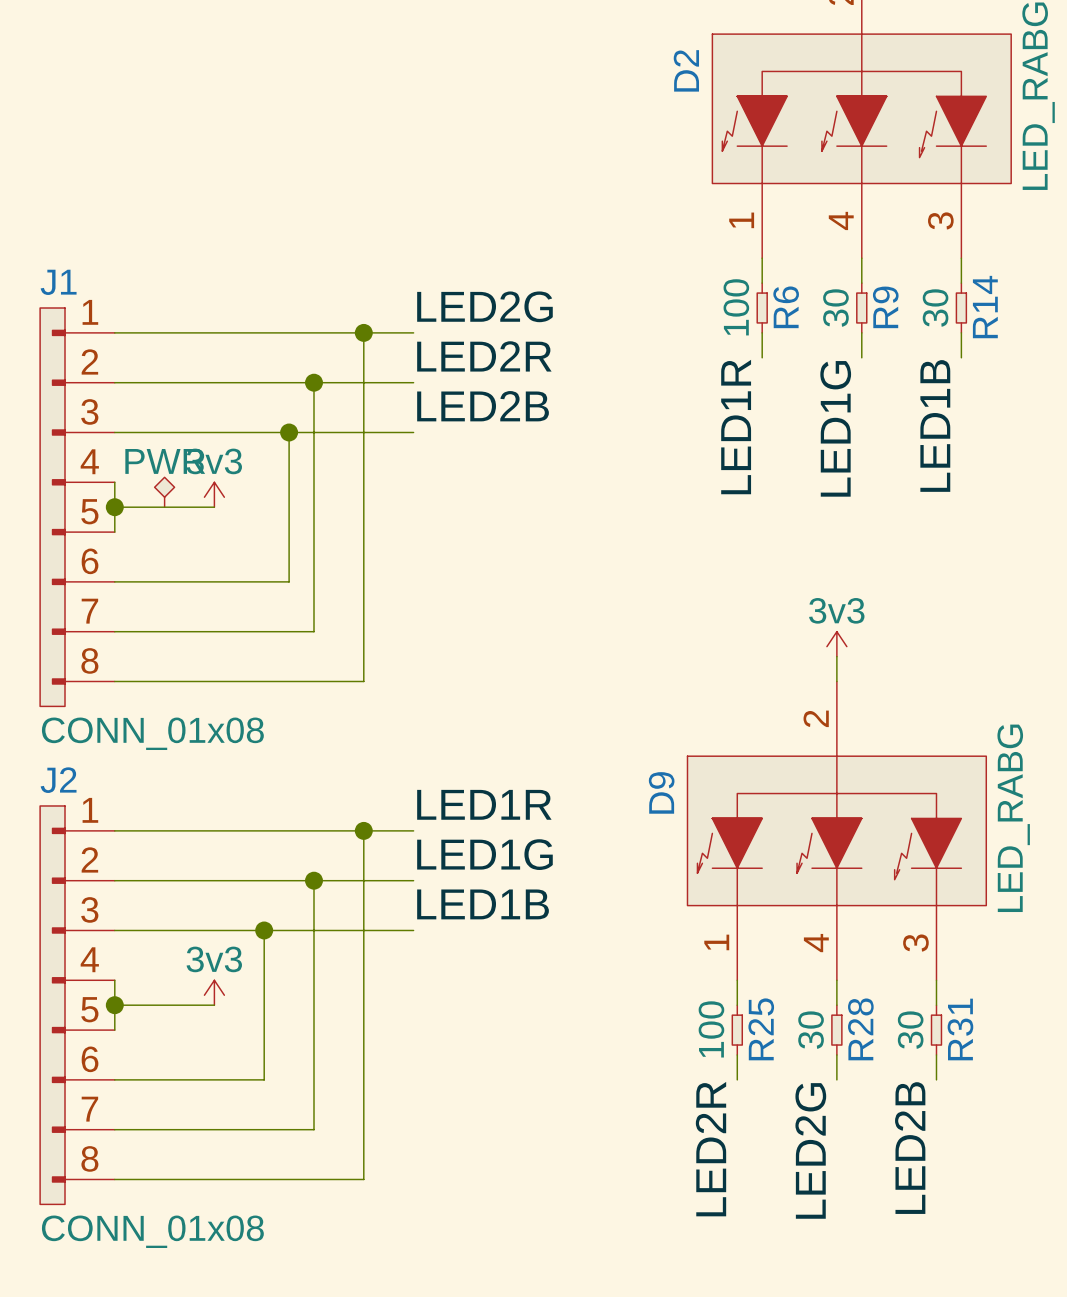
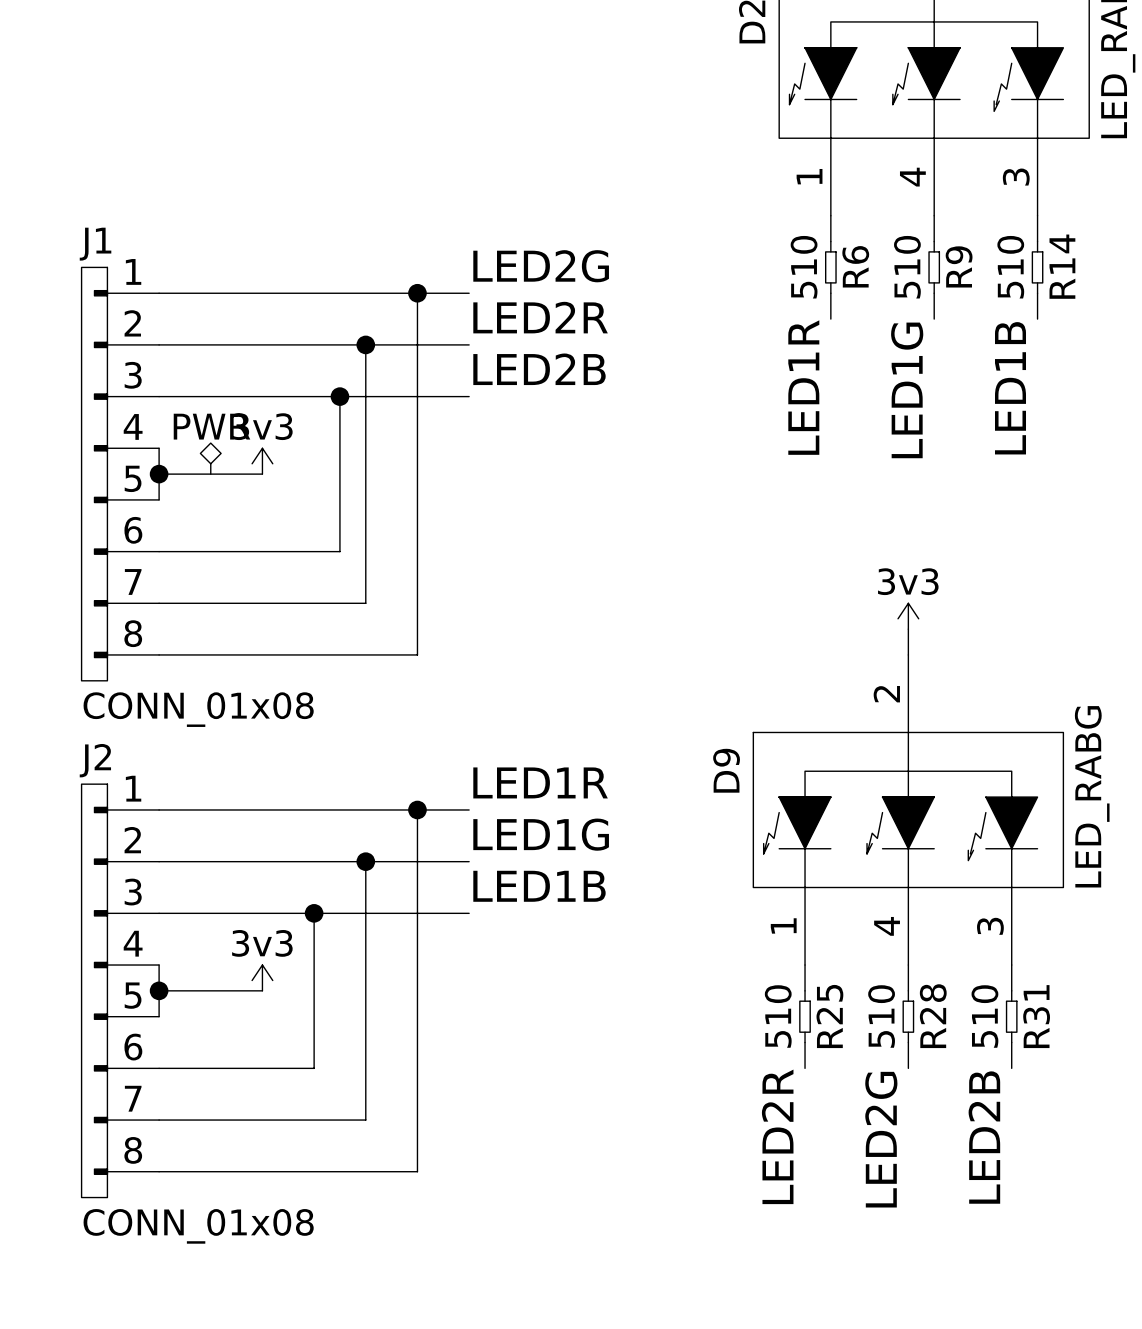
R6 value: 100 (736, 307) -> 510 (804, 267)
R9 value: 30 (835, 308) -> 510 (907, 267)
R14 value: 30 (935, 308) -> 510 (1010, 267)
R25 value: 100 (711, 1029) -> 510 (778, 1016)
R28 value: 30 (811, 1030) -> 510 (881, 1016)
R31 value: 30 (910, 1030) -> 510 (984, 1016)

